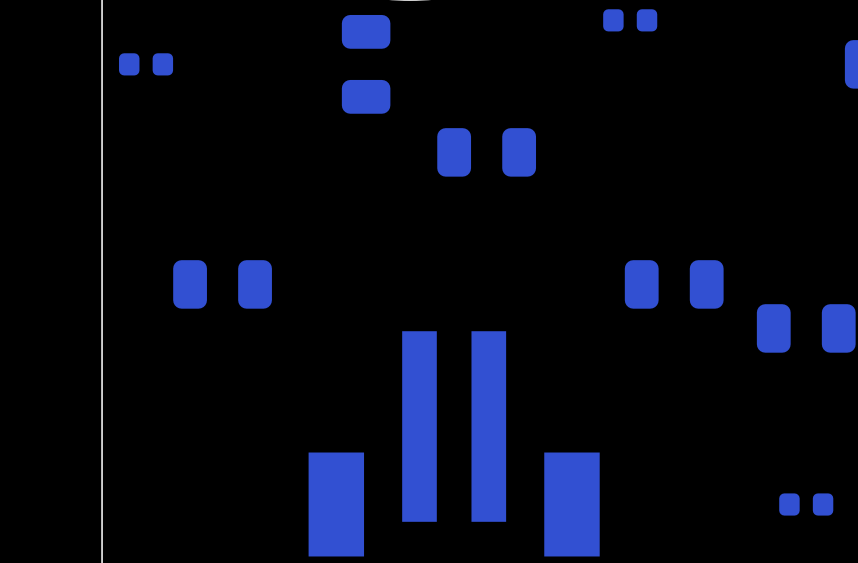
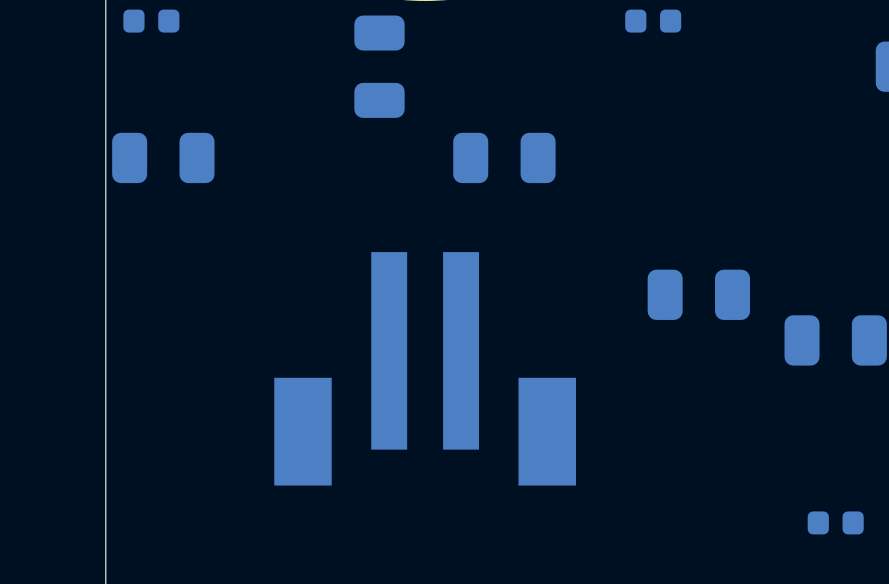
part position: (146, 64) -> (151, 21)
part position: (222, 284) -> (163, 157)
part position: (454, 443) -> (425, 368)

